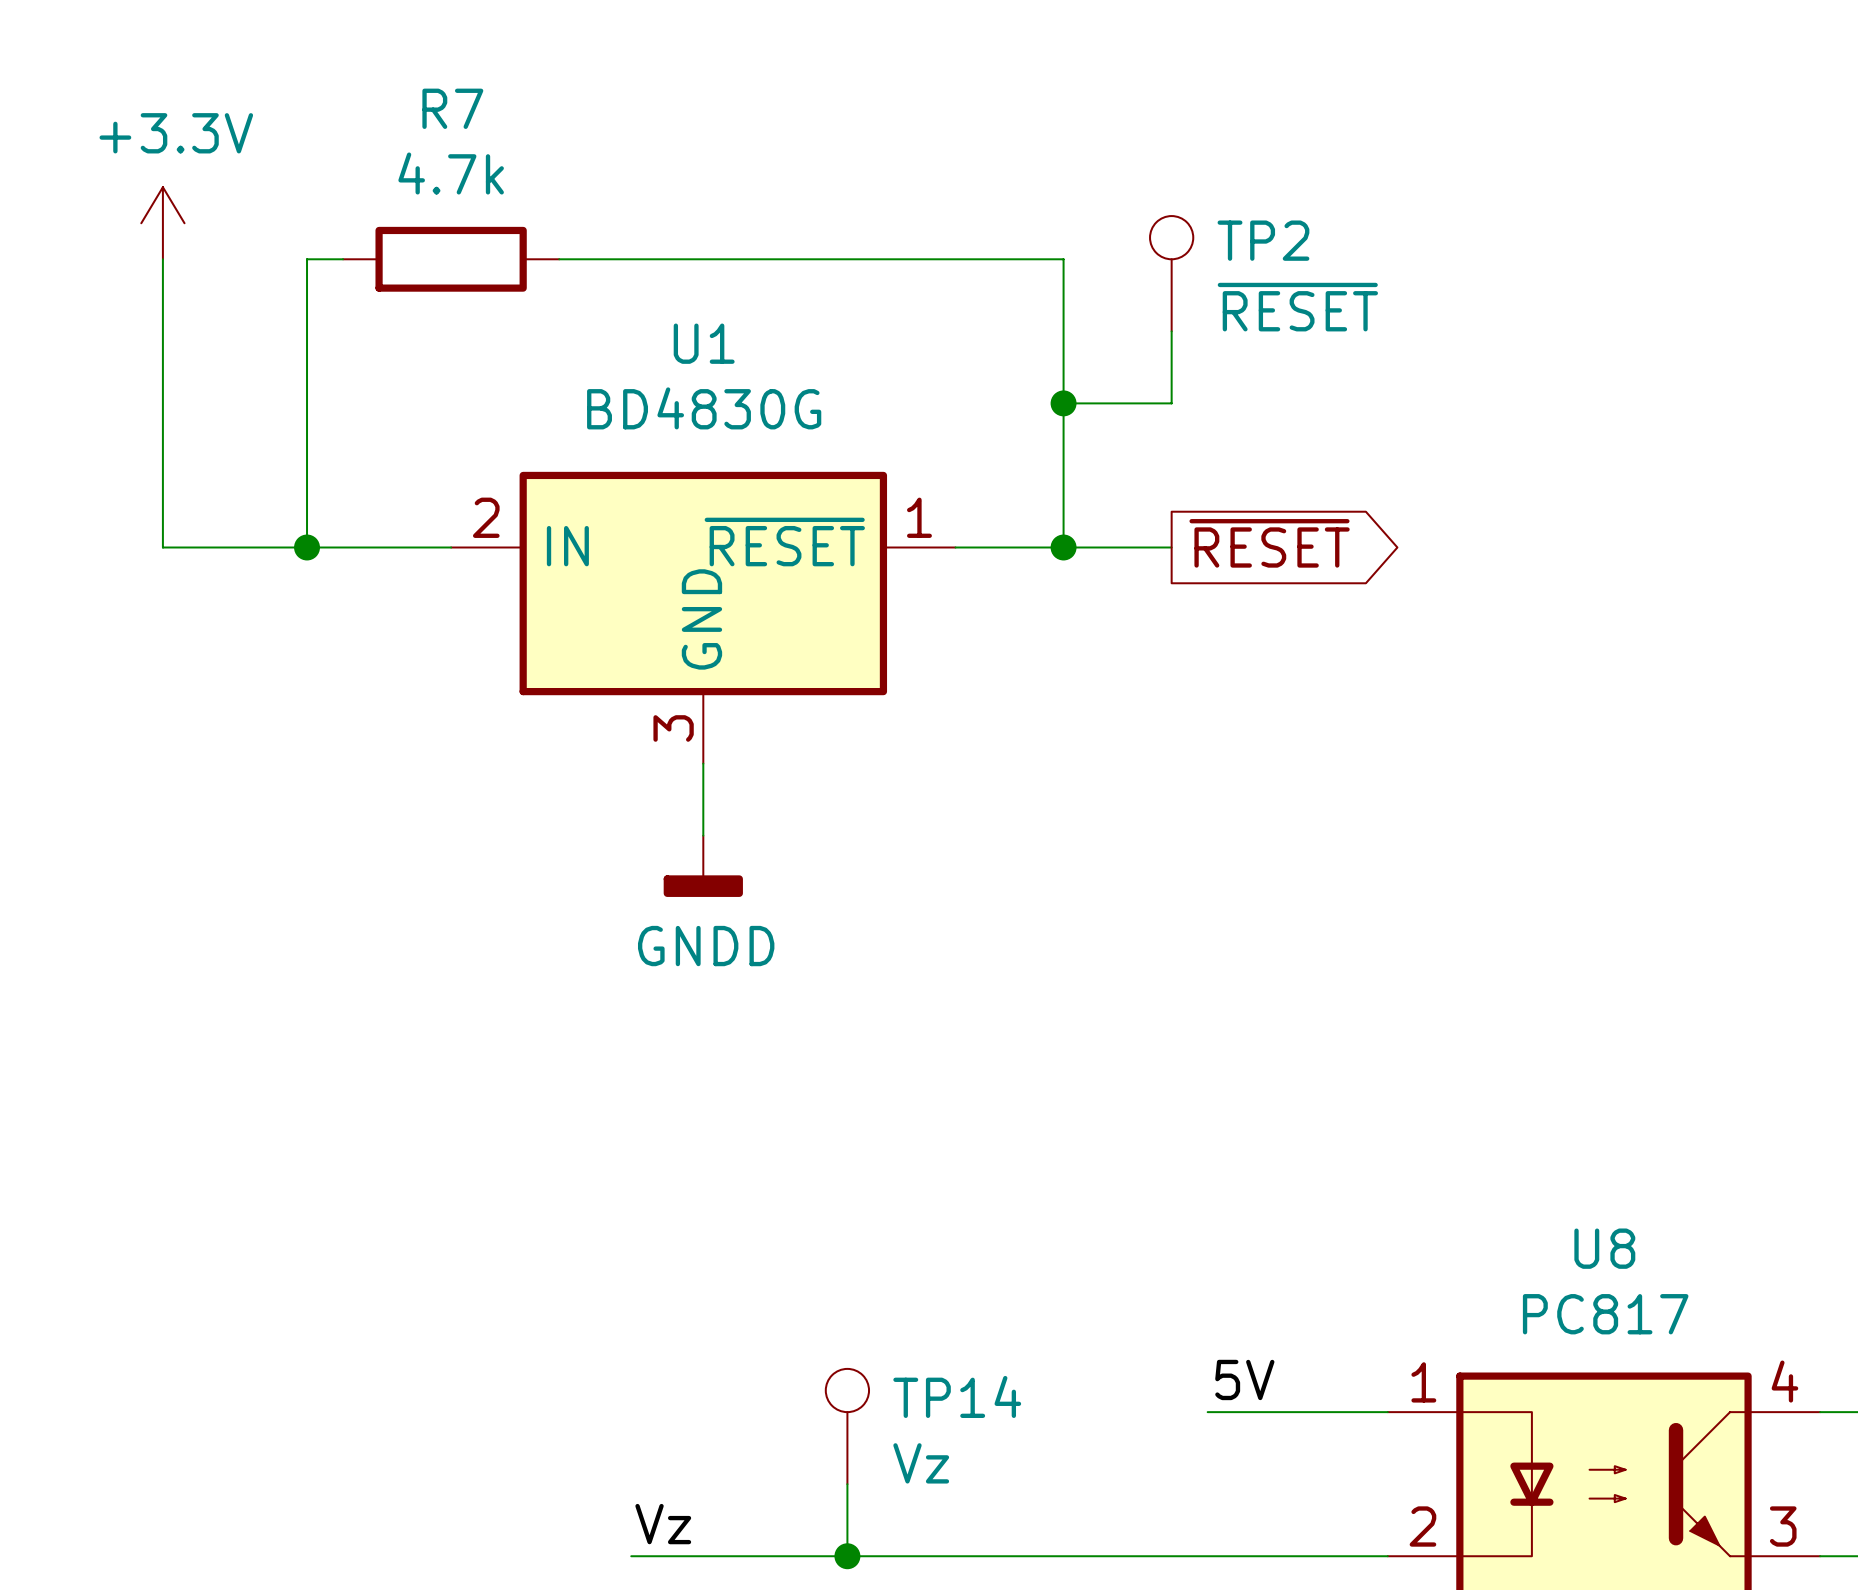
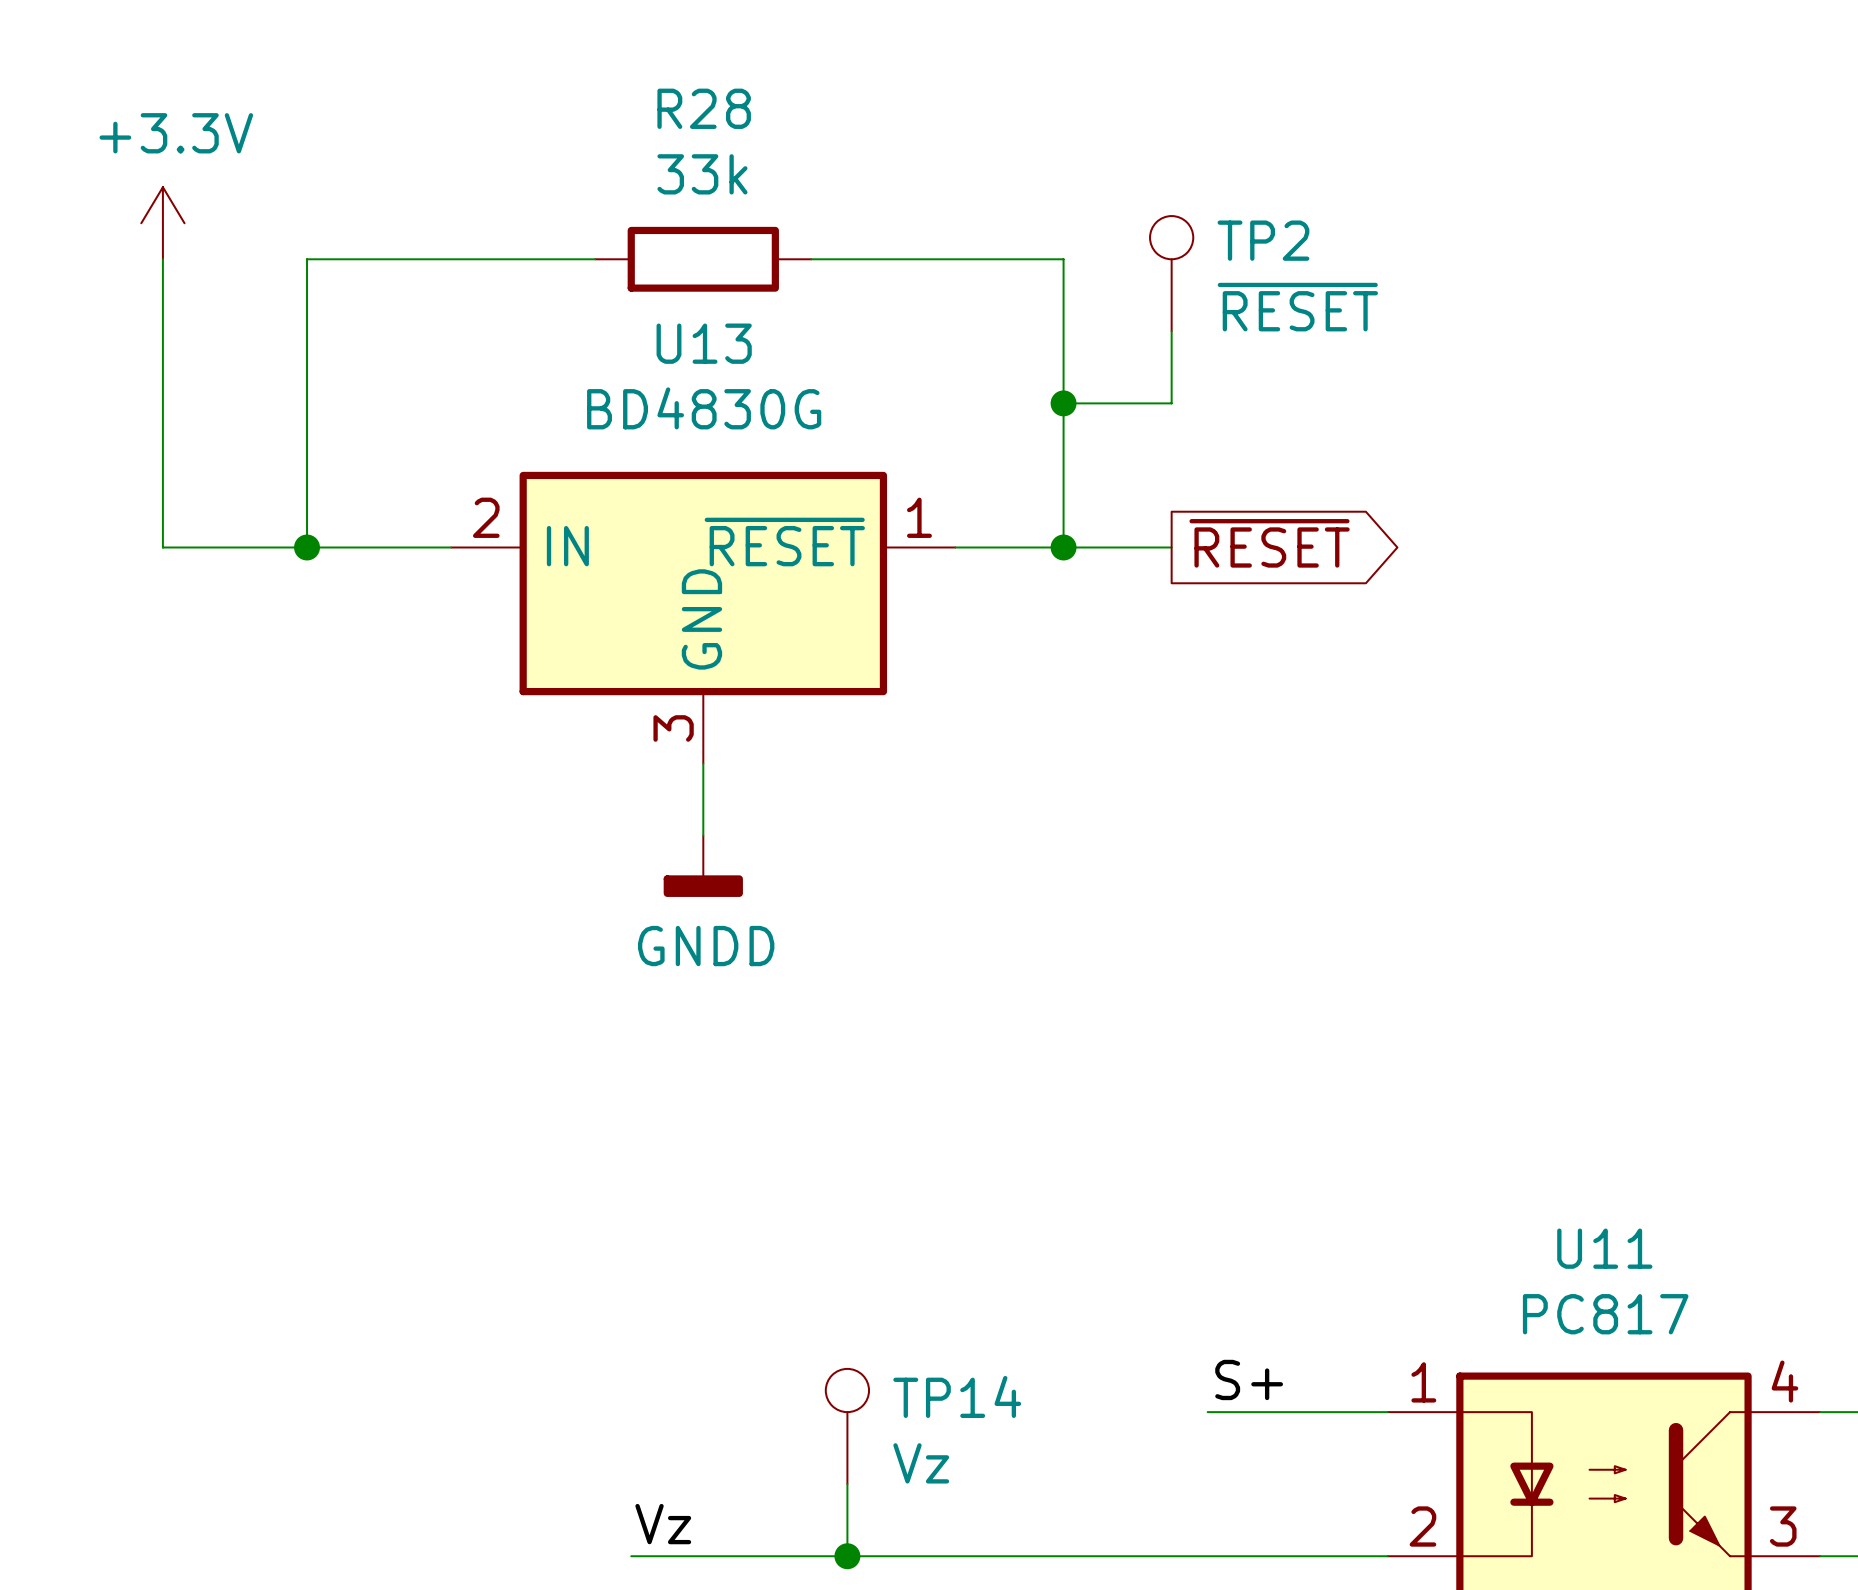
R7: 4.7k (451, 259) -> none
wire: (595, 259) (811, 259) -> (343, 259) (559, 259)
R28: none -> 33k (703, 259)
U1 name: U1 (704, 343) -> U13 (704, 343)
U8 name: U8 (1604, 1248) -> U11 (1604, 1248)
label: 5V (1244, 1379) -> S+ (1249, 1379)

